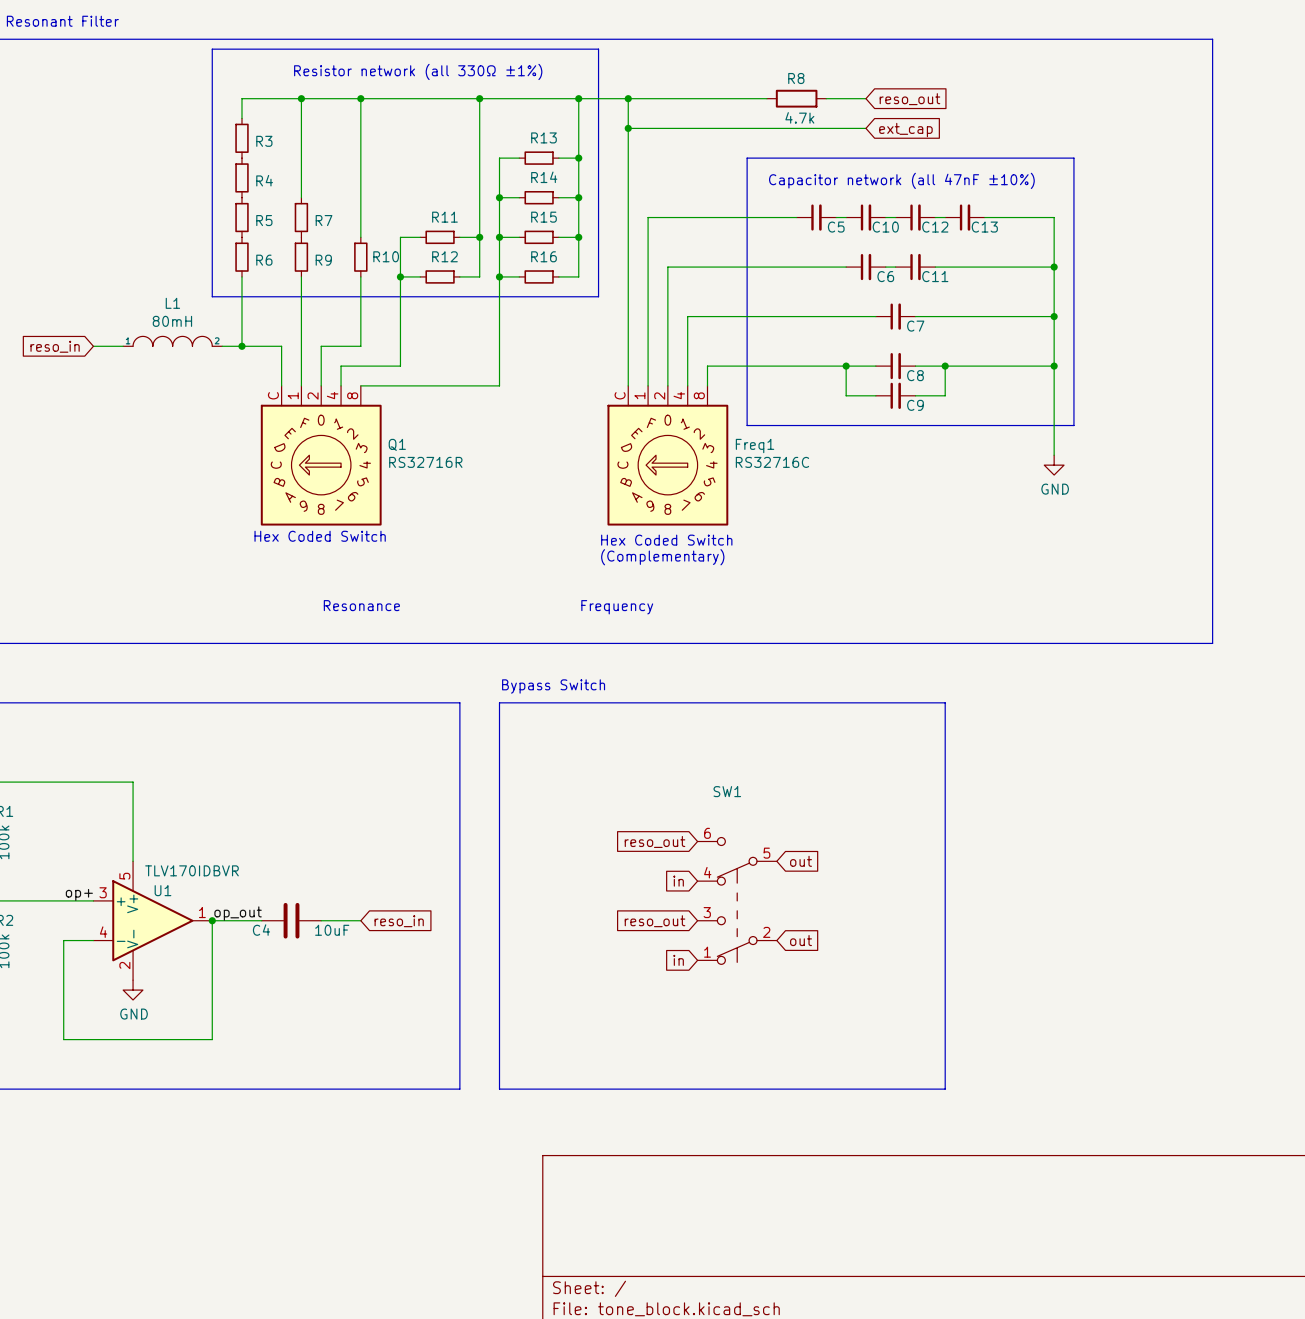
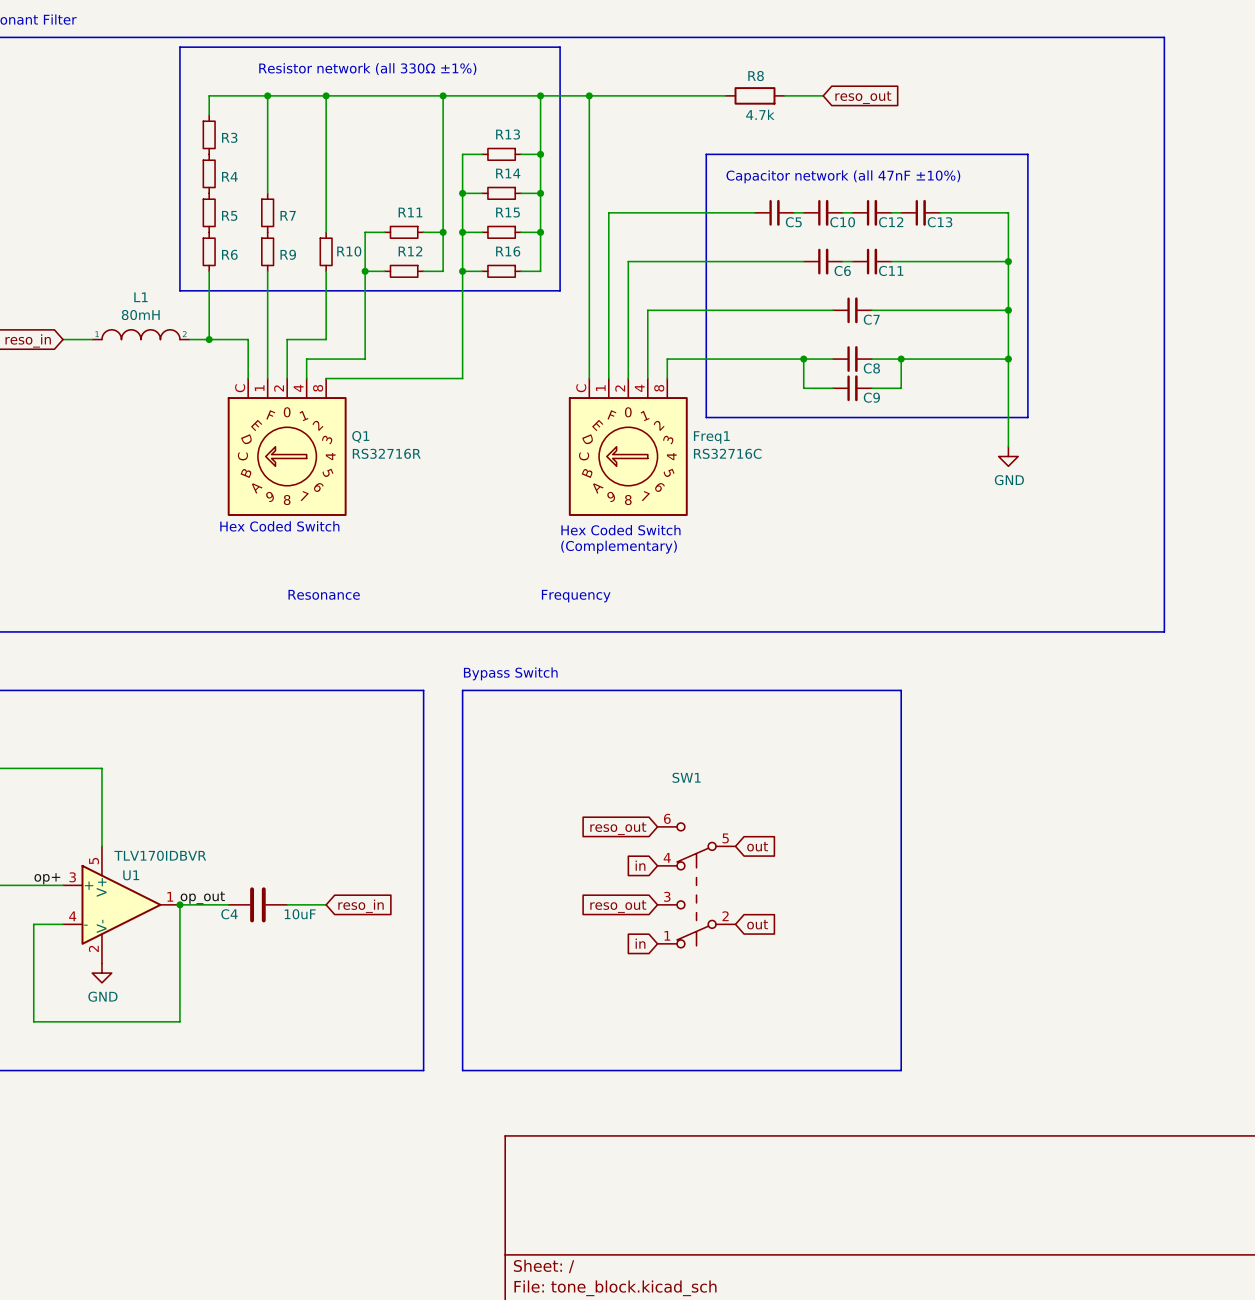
wire: (628, 128) (865, 128) -> none
junction: (628, 128) -> none
global label: ext_cap (905, 130) -> none

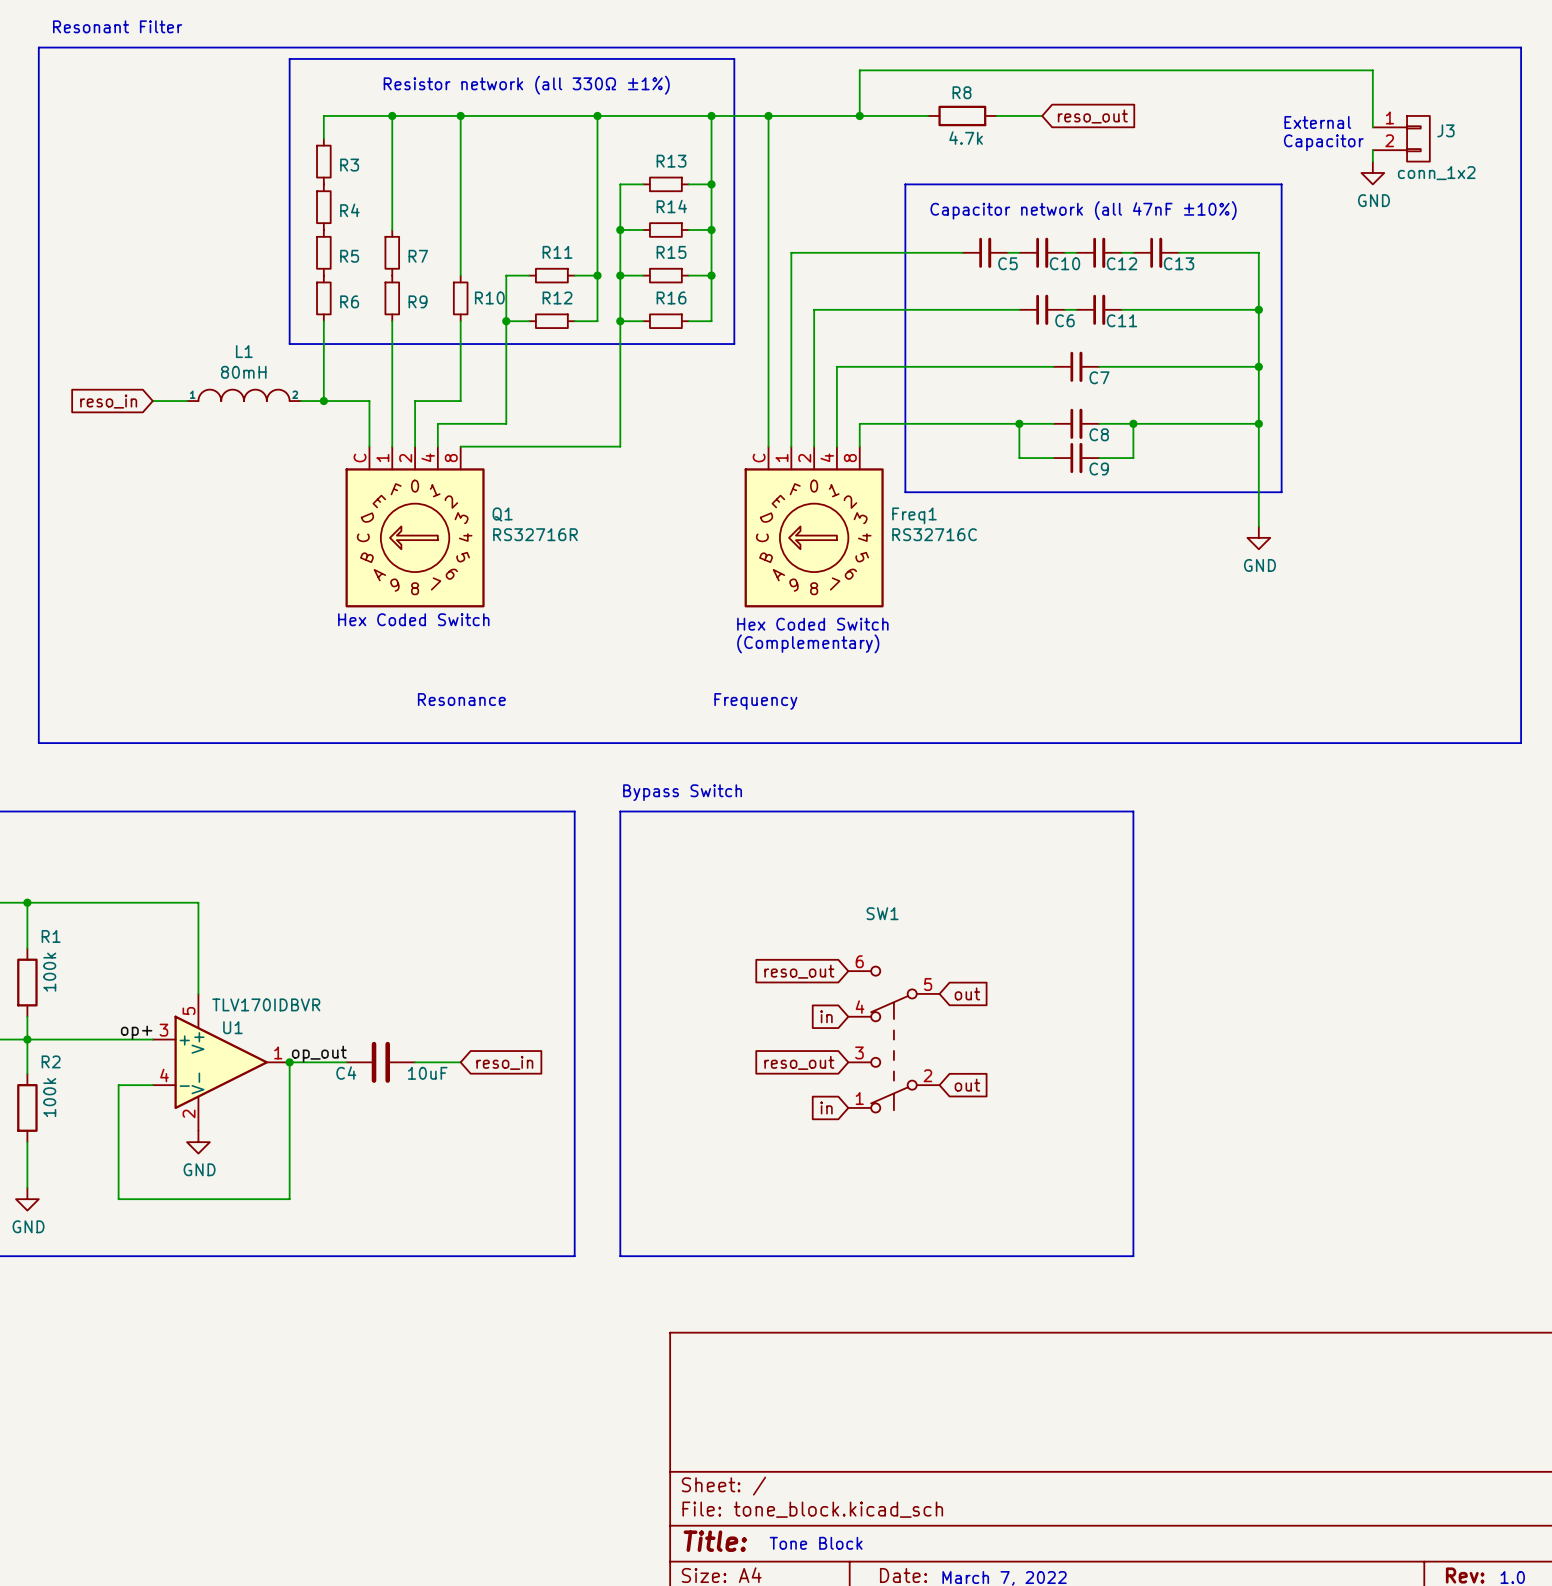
line: (1164, 37) (1164, 631) -> (1441, 47) (1521, 47) (1521, 743) (1441, 743)
wire: none -> (859, 115) (859, 70) (1372, 70) (1372, 127)
junction: none -> (859, 115)
text: none -> External (1317, 122)
J3: none -> conn_1x2 (1401, 138)
text: none -> Capacitor (1323, 142)
wire: none -> (1372, 150) (1372, 161)
power symbol: none -> GND (1372, 172)

